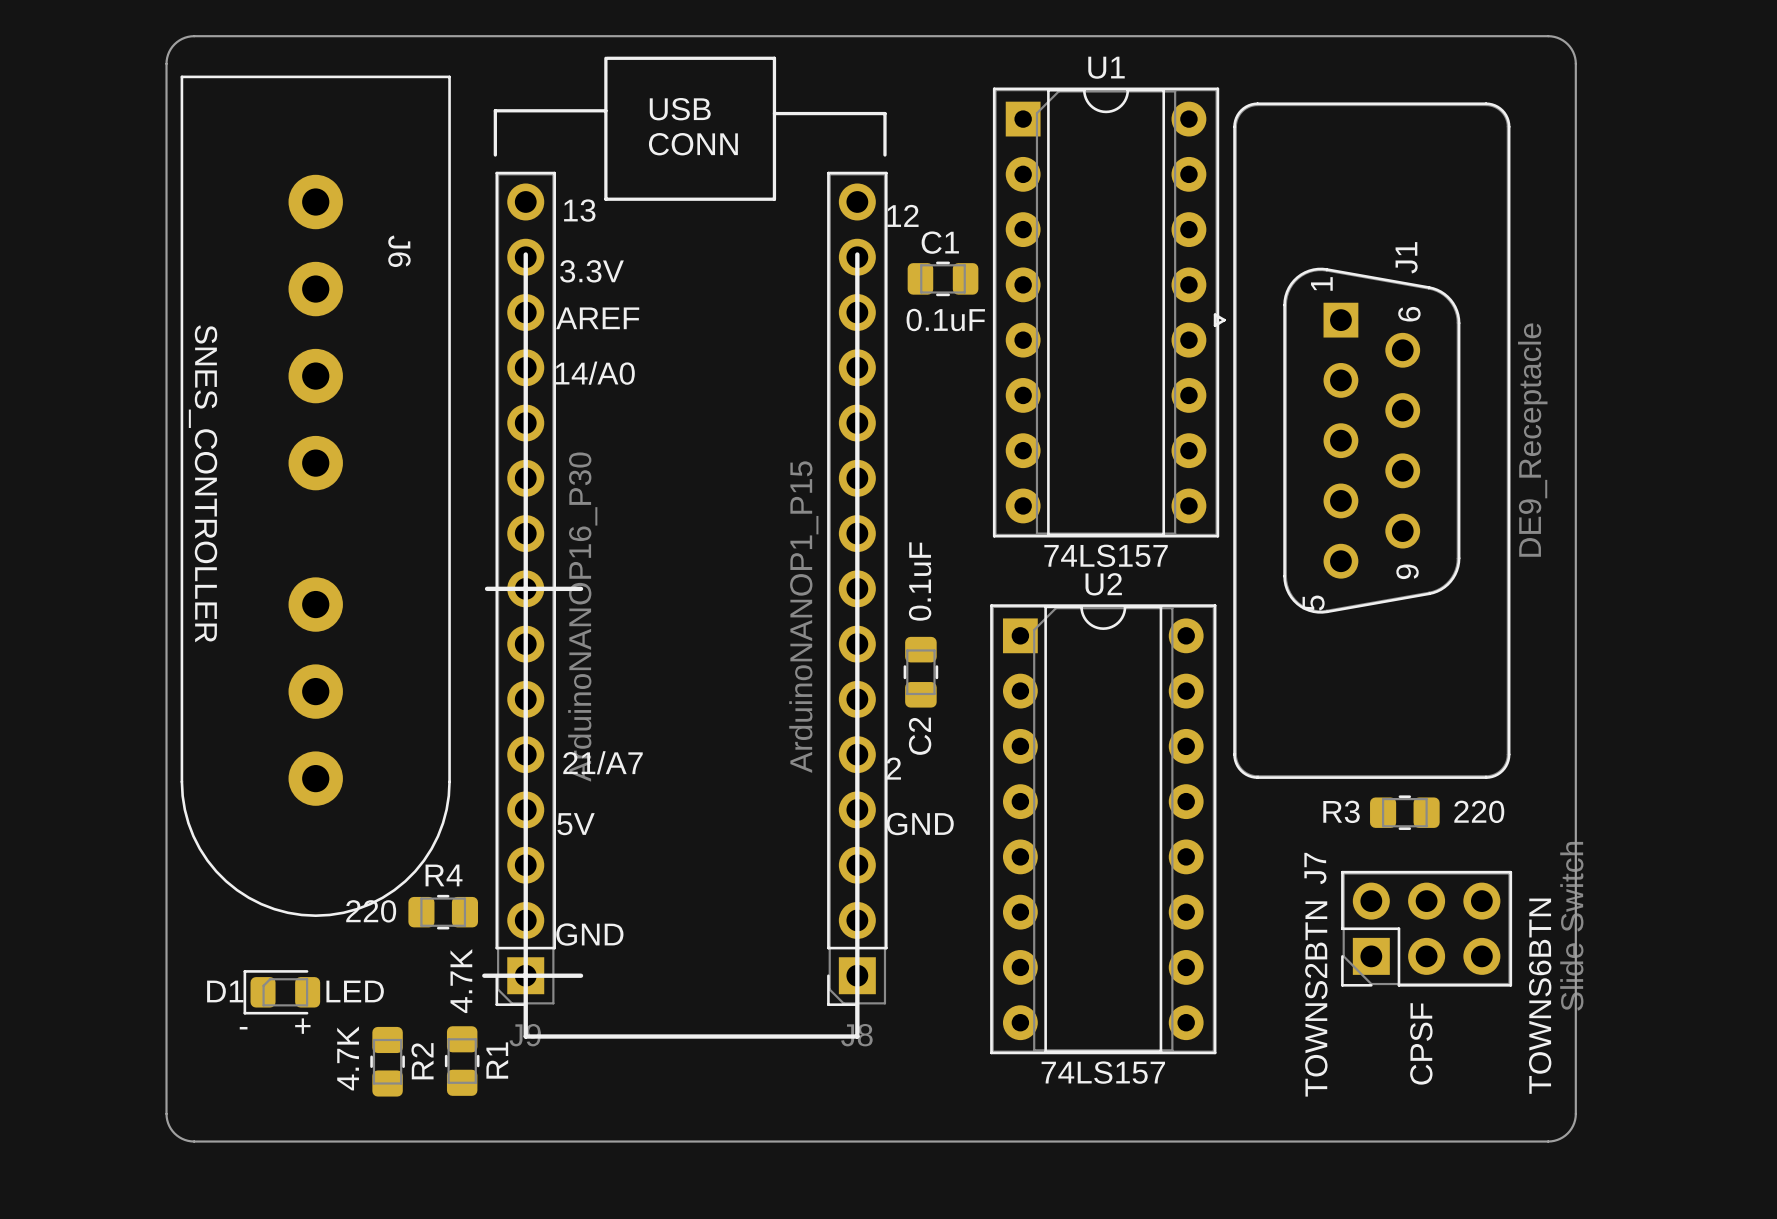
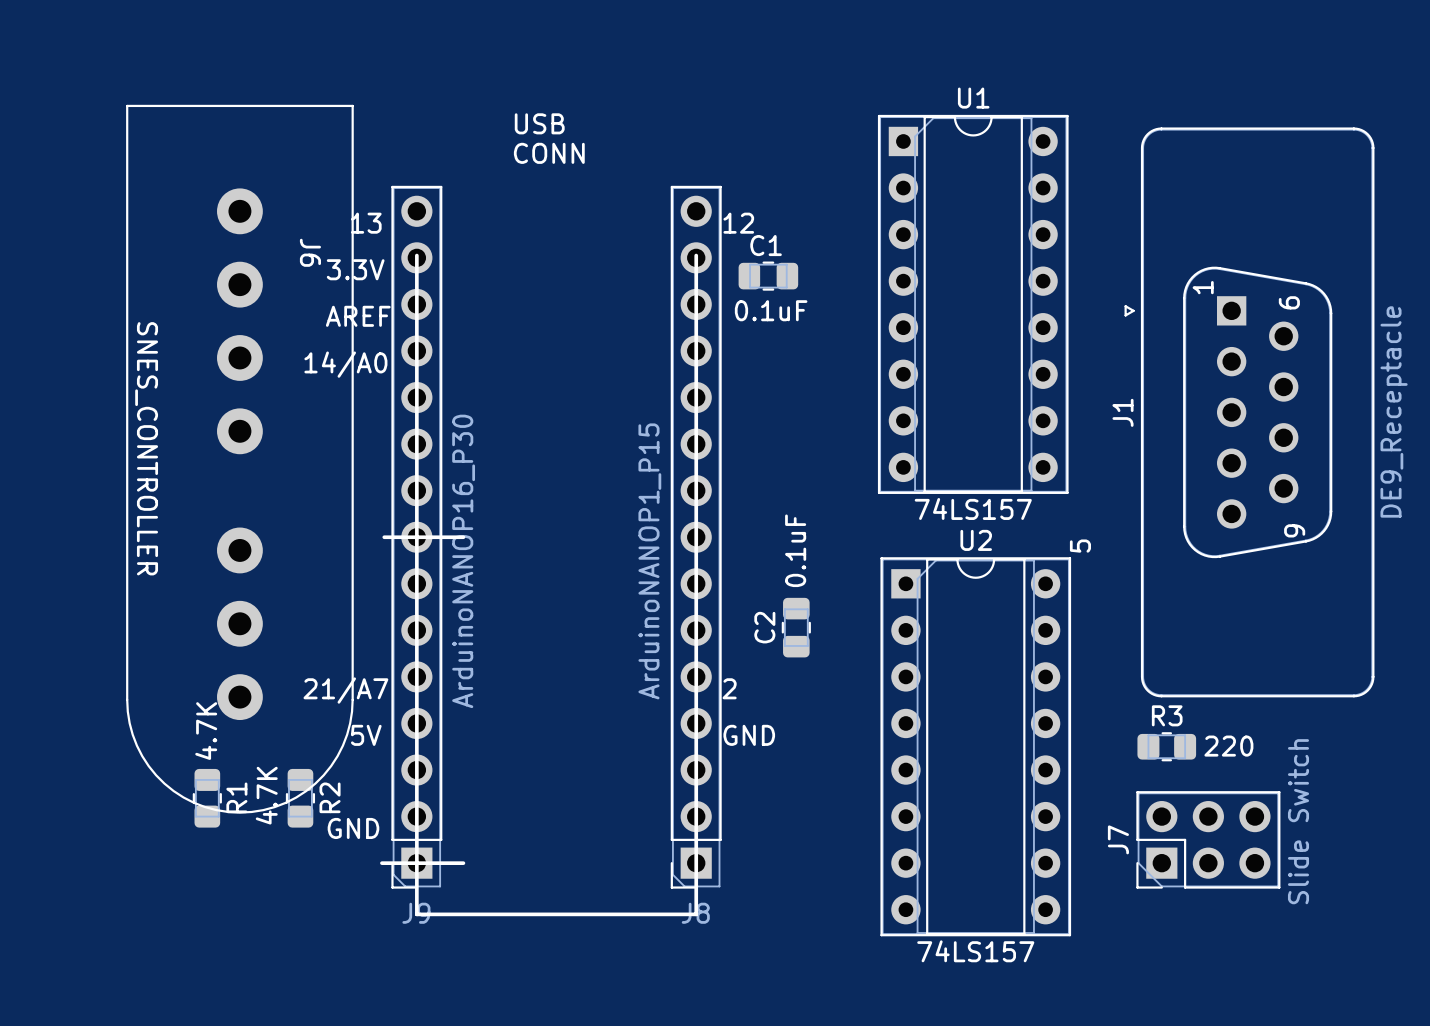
board edge: (194, 36) (1548, 36) (1557, 37) (1565, 42) (1573, 51) (1575, 63) (1575, 1113) (1574, 1123) (1569, 1131) (1560, 1138) (1548, 1141) (194, 1141) (185, 1139) (176, 1135) (169, 1125) (166, 1113) (166, 63) (168, 54) (174, 44) (182, 38) (194, 36) -> none
line: (605, 58) (605, 199) (774, 199) (774, 58) (607, 58) -> none
text position: USB (680, 109) -> USB (539, 123)
line: (605, 110) (495, 110) (495, 155) -> none
line: (774, 113) (884, 113) (884, 155) -> none
text position: CONN (693, 144) -> CONN (549, 153)
text position: 13 (579, 210) -> 13 (366, 223)
J1 name position: J1 (1406, 257) -> J1 (1123, 412)
text position: 3.3V (591, 271) -> 3.3V (355, 269)
text position: 1 (1321, 283) -> 1 (1203, 287)
U1 position: (1106, 312) -> (973, 304)
text position: 6 (1409, 314) -> 6 (1289, 302)
text position: AREF (597, 318) -> AREF (358, 316)
text position: 14/A0 (595, 373) -> 14/A0 (345, 364)
J1 position: (1362, 440) -> (1249, 412)
text position: 9 (1407, 571) -> 9 (1294, 530)
C2 position: (920, 672) -> (796, 627)
C2 name position: C2 (920, 736) -> C2 (764, 627)
text position: 21/A7 (602, 762) -> 21/A7 (345, 690)
R3 name position: R3 (1341, 811) -> R3 (1167, 715)
R3 position: (1404, 812) -> (1166, 746)
text position: 5V (576, 824) -> 5V (366, 735)
U2 position: (1103, 829) -> (975, 746)
J7 name position: J7 (1315, 868) -> J7 (1118, 839)
R4: 220 (443, 912) -> none
J7 position: (1426, 928) -> (1208, 839)
text position: GND (589, 934) -> GND (353, 828)
D1: LED (281, 992) -> none
text: TOWNS6BTN (1540, 996) -> none
text: TOWNS2BTN (1316, 998) -> none
text: + (302, 1026) -> none
text: - (243, 1028) -> none
text: CPSF (1421, 1043) -> none
R2 position: (387, 1061) -> (300, 798)
R1 position: (462, 1061) -> (207, 798)

